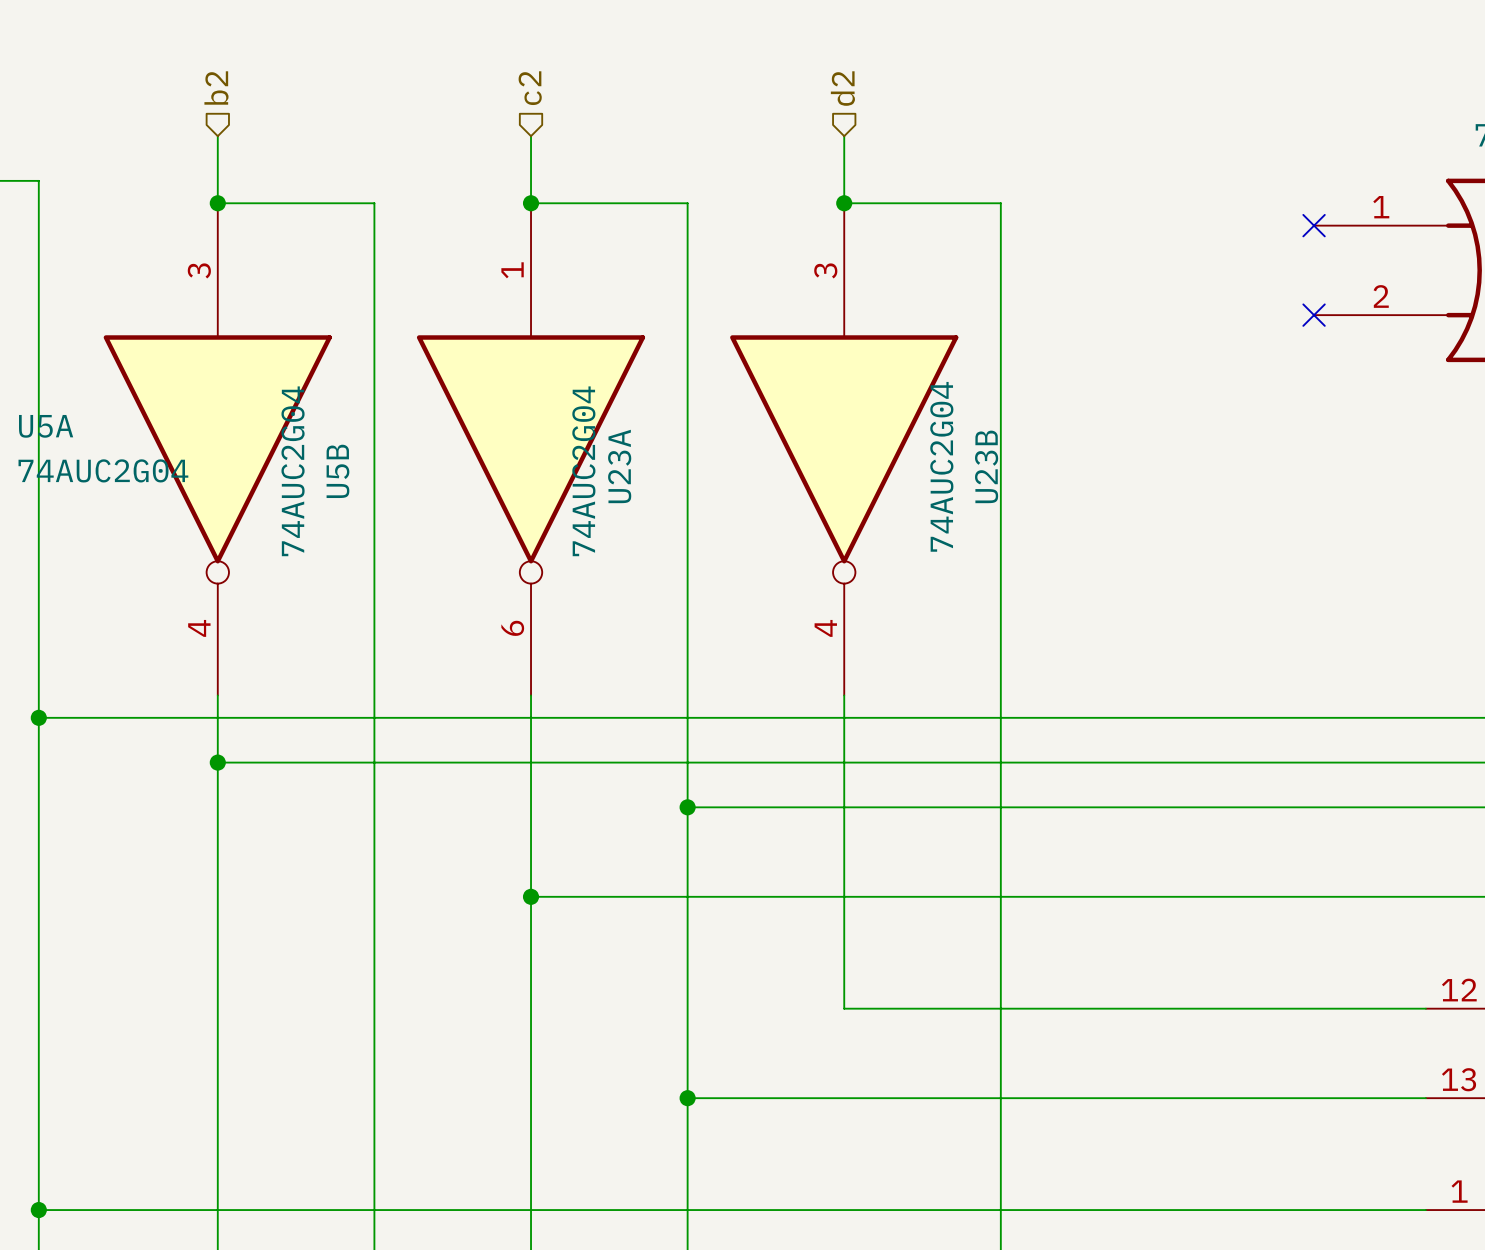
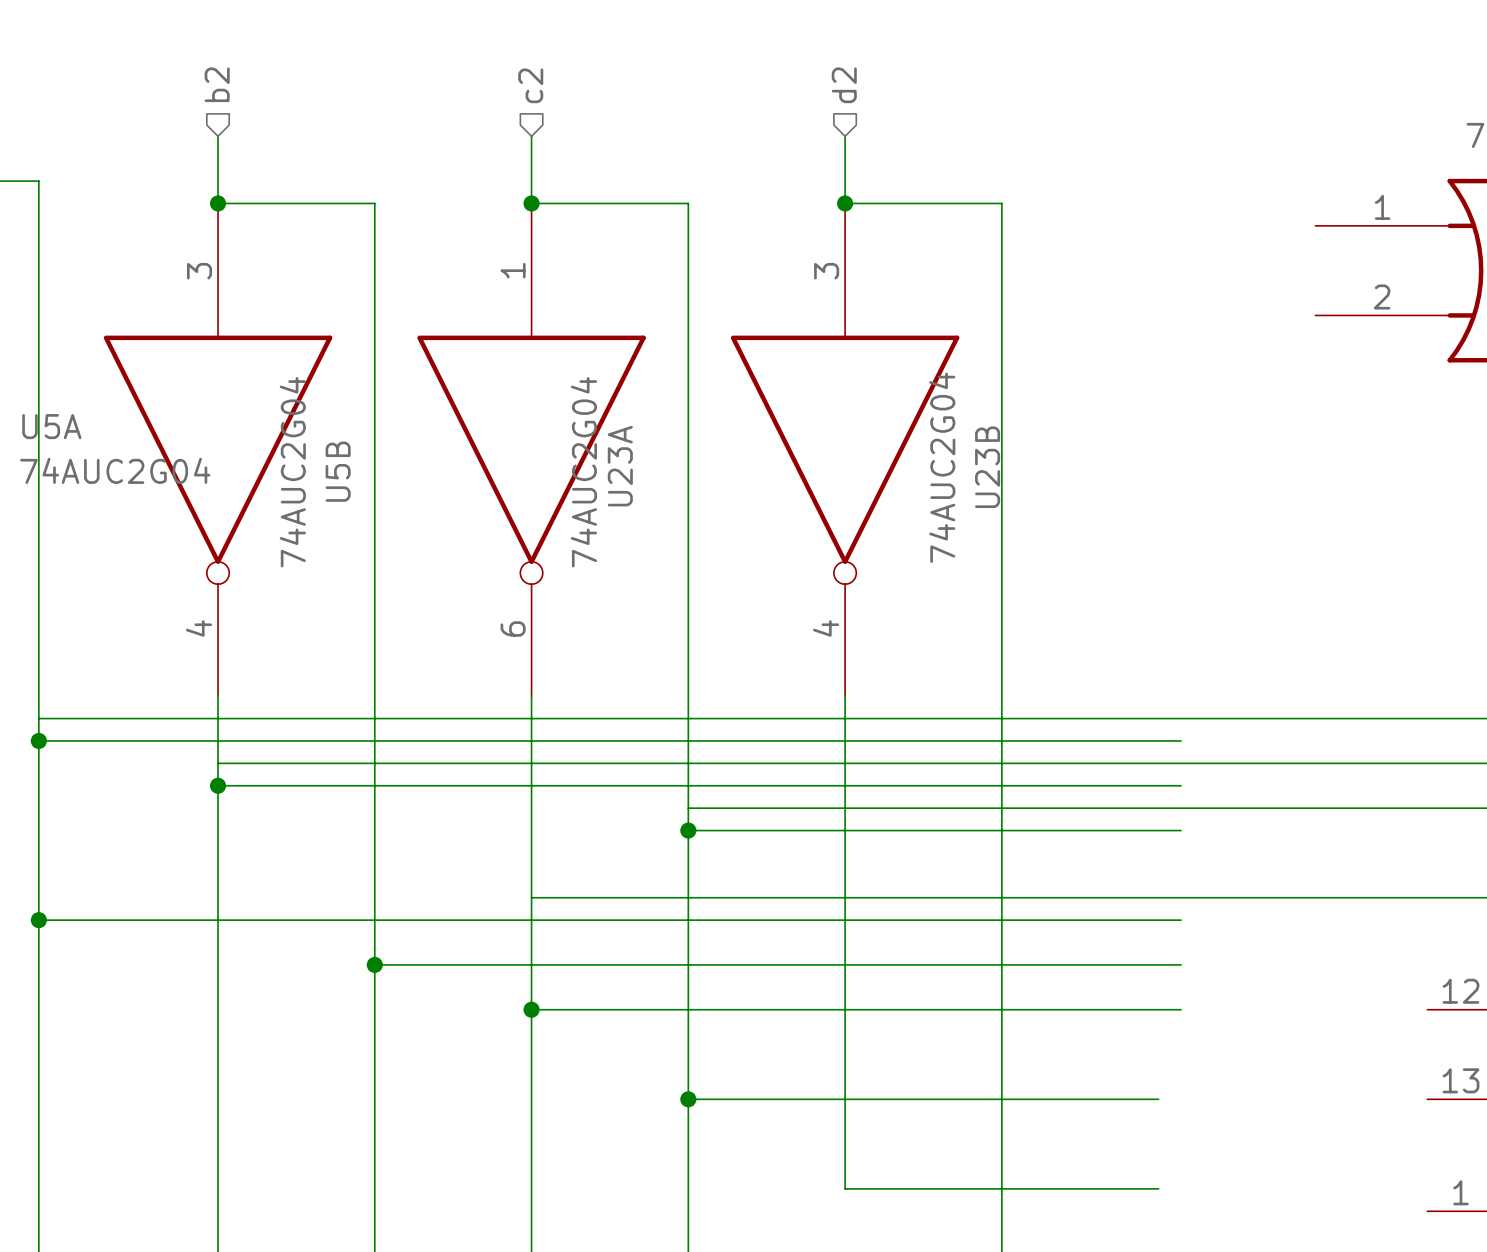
no-connect mark: (1314, 225) -> none
no-connect mark: (1314, 315) -> none
junction position: (38, 717) -> (38, 740)
wire: none -> (38, 740) (1181, 740)
junction position: (217, 762) -> (218, 785)
wire: none -> (218, 785) (1181, 785)
junction position: (687, 807) -> (688, 830)
wire: none -> (688, 830) (1181, 830)
junction: (531, 896) -> none
wire: none -> (38, 920) (1181, 920)
junction: none -> (38, 920)
wire: none -> (374, 964) (1181, 964)
junction: none -> (374, 964)
wire: none -> (531, 1009) (845, 1009) (845, 1188) (1158, 1188)
junction: none -> (531, 1009)
wire: (1179, 1008) (1425, 1008) -> none
wire: (1157, 1098) (1425, 1098) -> none
wire: (38, 1210) (1425, 1210) -> none
junction: (38, 1210) -> none

